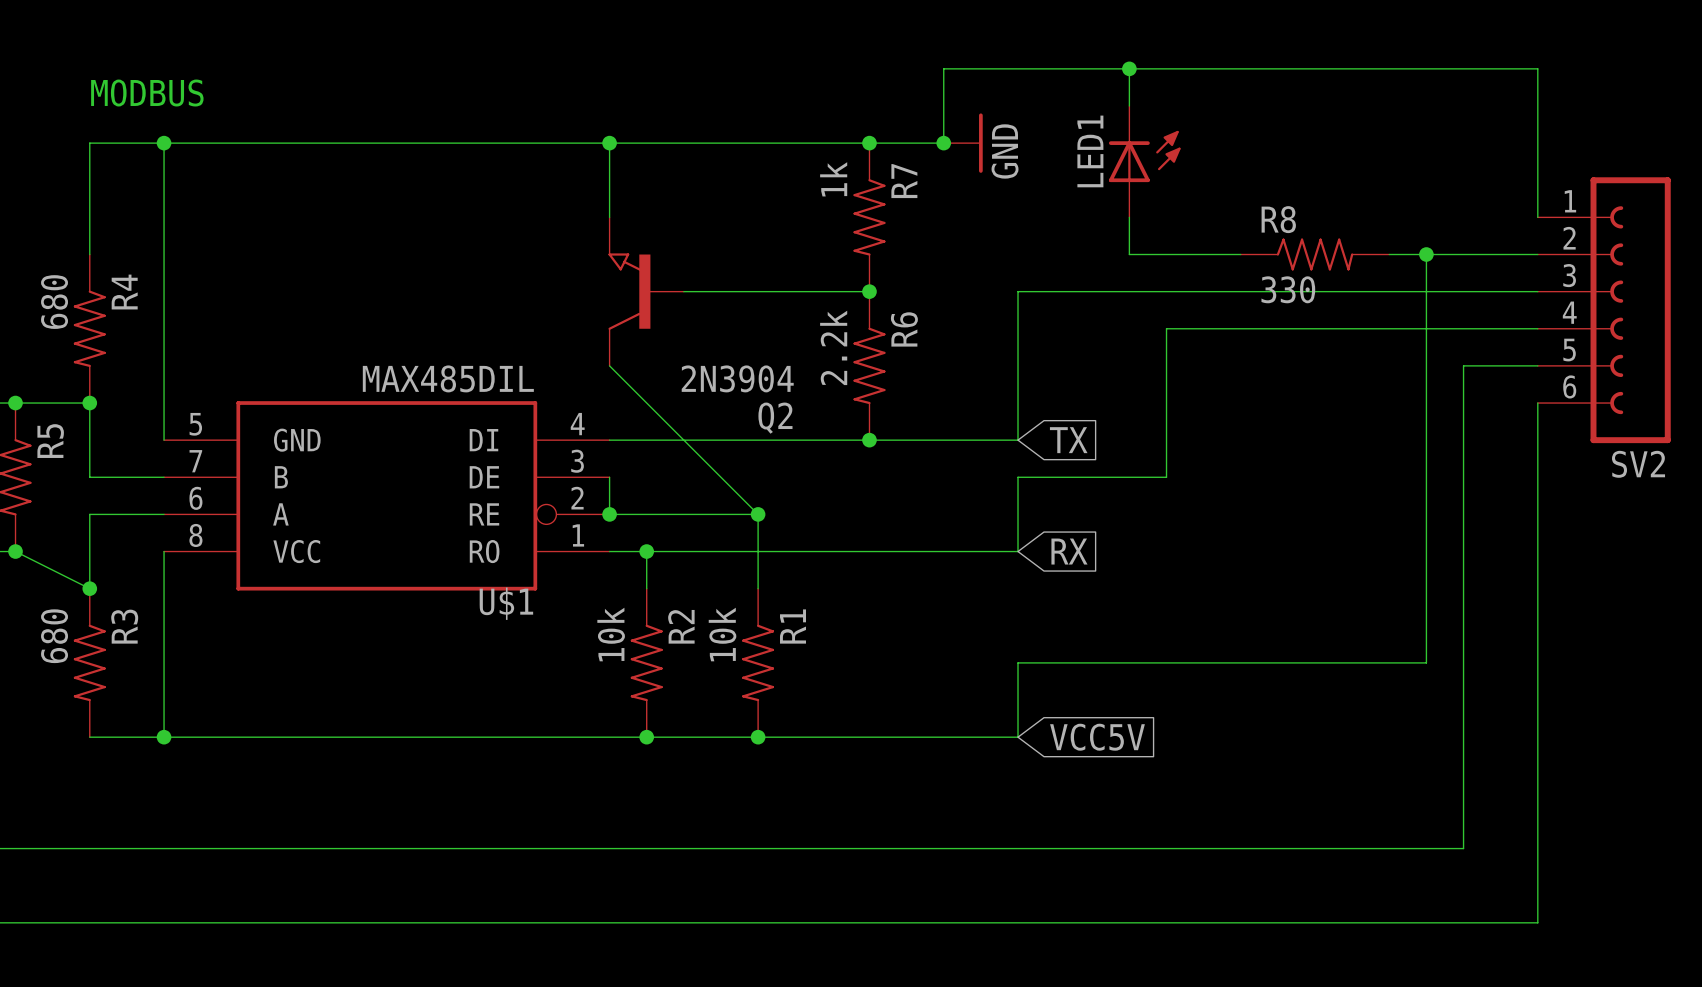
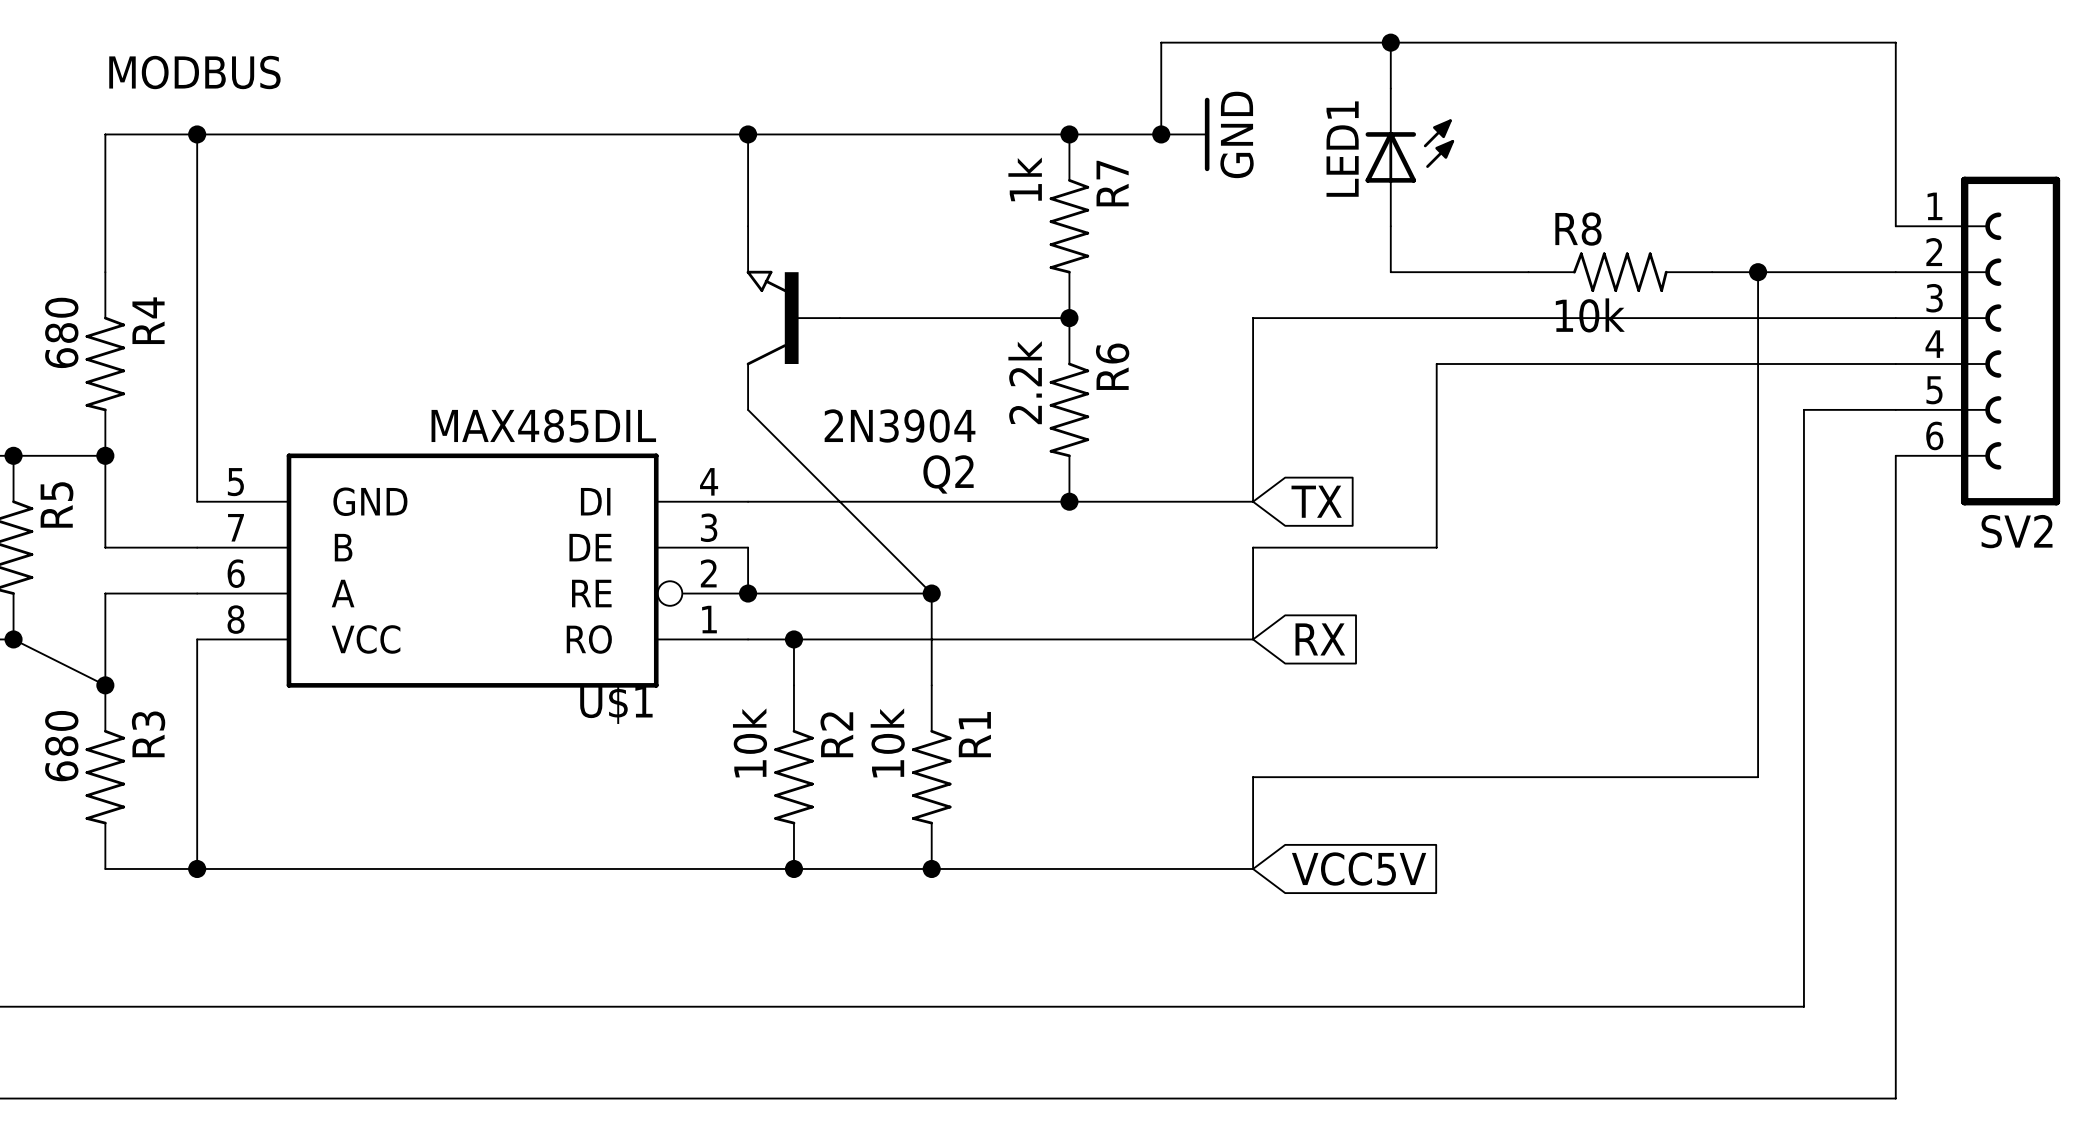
R8 value: 330 (1288, 289) -> 10k (1590, 315)

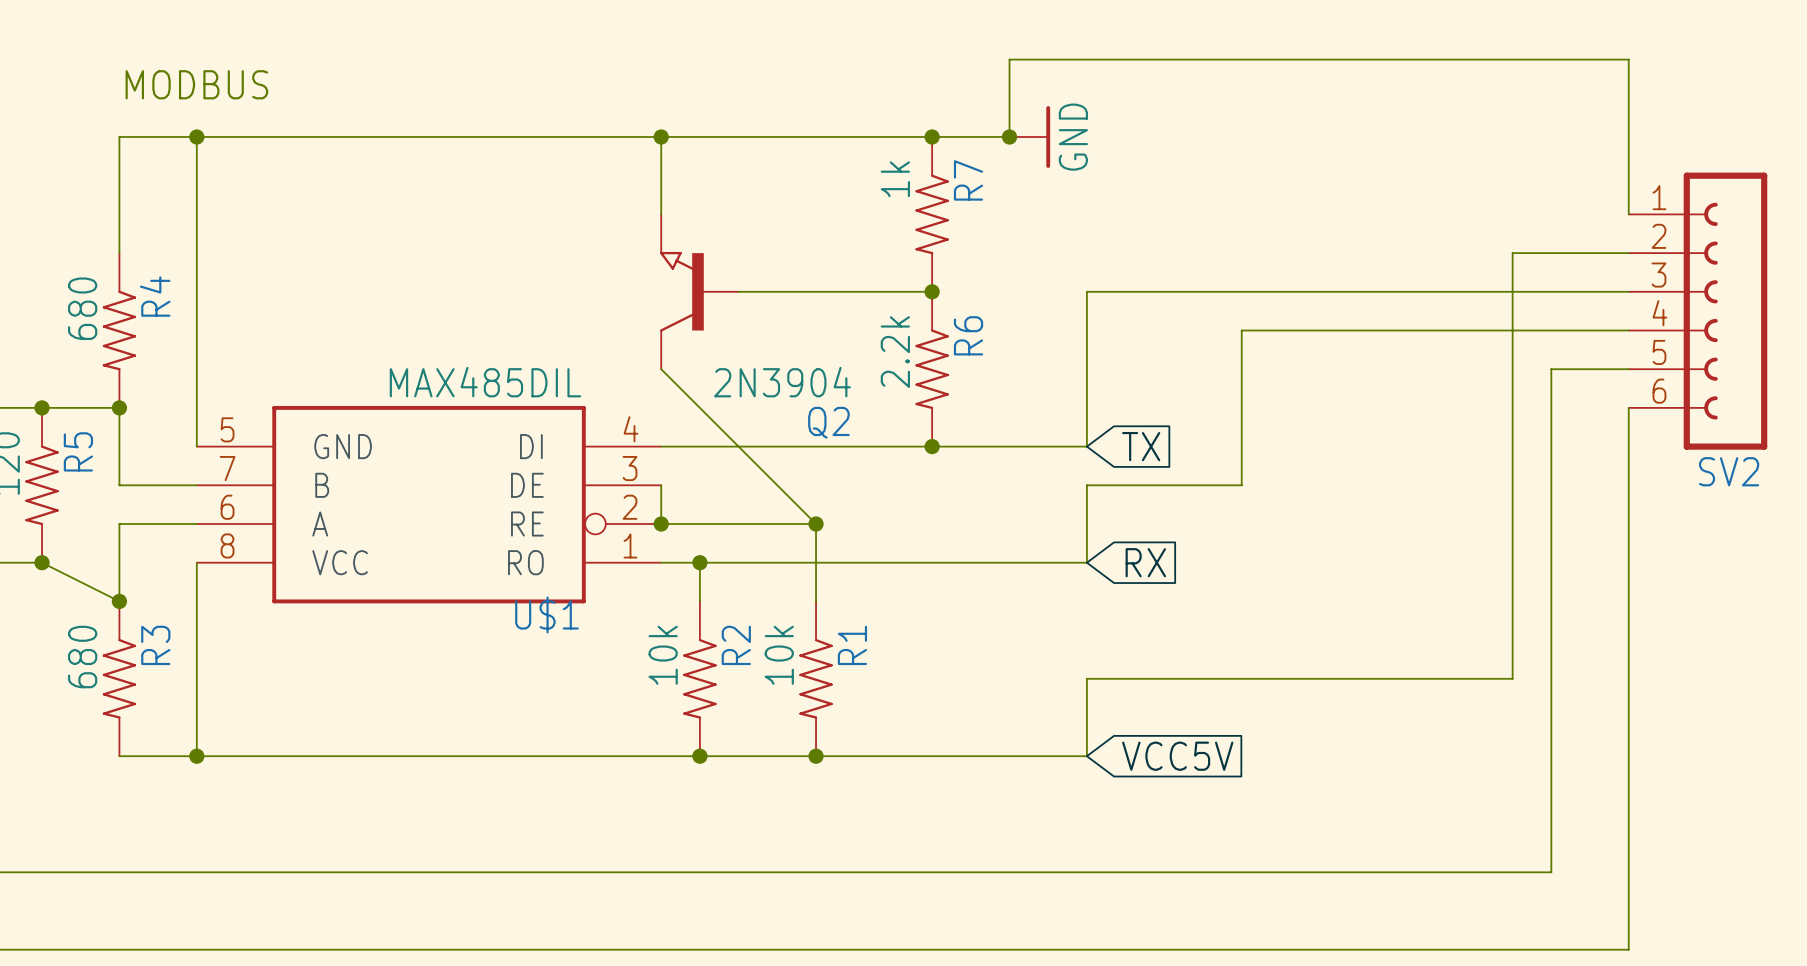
wire: (1390, 42) (1390, 88) -> none
junction: (1390, 42) -> none
LED1: (1409, 157) -> none
wire: (1390, 226) (1390, 272) (1528, 272) -> none
R8: 10k (1620, 272) -> none
wire: (1712, 272) (1758, 272) -> none
junction: (1758, 272) -> none

